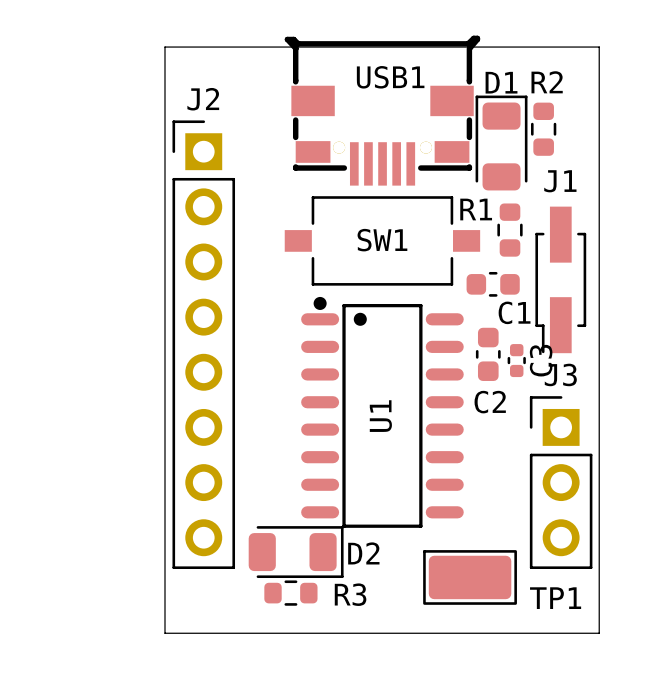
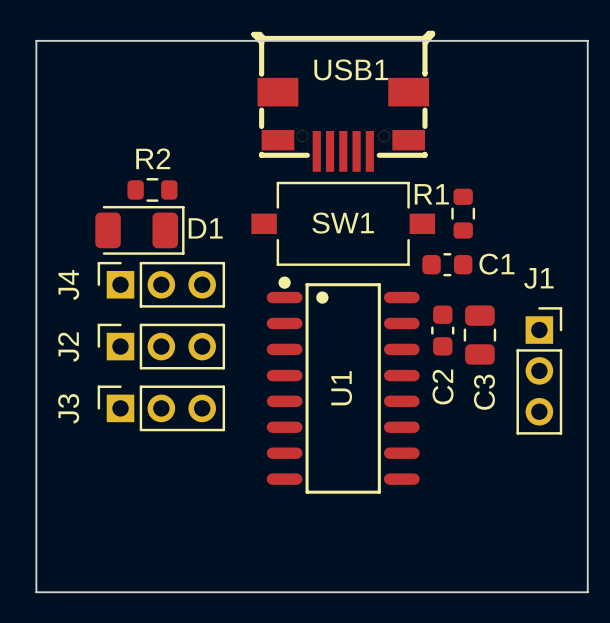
board edge: (164, 47) (599, 47) (599, 633) (164, 633) (164, 47) -> (36, 40) (36, 592) (587, 592) (587, 40) (36, 40)
J2 name position: J2 (203, 99) -> J2 (68, 347)
J2 footprint: [172, 120, 236, 569] -> [97, 323, 226, 370]
R2 rotation: 0° (543, 129) -> 90° clockwise (152, 189)
R2 position: (543, 129) -> (152, 189)
D1 rotation: 0° (501, 143) -> 90° clockwise (139, 230)
D1 position: (501, 143) -> (139, 230)
J1 footprint: [535, 206, 587, 354] -> [516, 307, 563, 435]
J4: none -> (161, 284)
C1 name position: C1 (514, 312) -> C1 (496, 264)
C3 footprint: [507, 344, 526, 378] -> [463, 305, 497, 365]
C3 name position: C3 (541, 360) -> C3 (484, 392)
J3 name position: J3 (560, 374) -> J3 (68, 408)
J3 footprint: [529, 396, 593, 569] -> [97, 385, 226, 432]
C2 name rotation: 0° (490, 402) -> 90° counterclockwise (443, 387)
D2: (296, 552) -> none
TP1: (470, 577) -> none
R3: (290, 593) -> none

